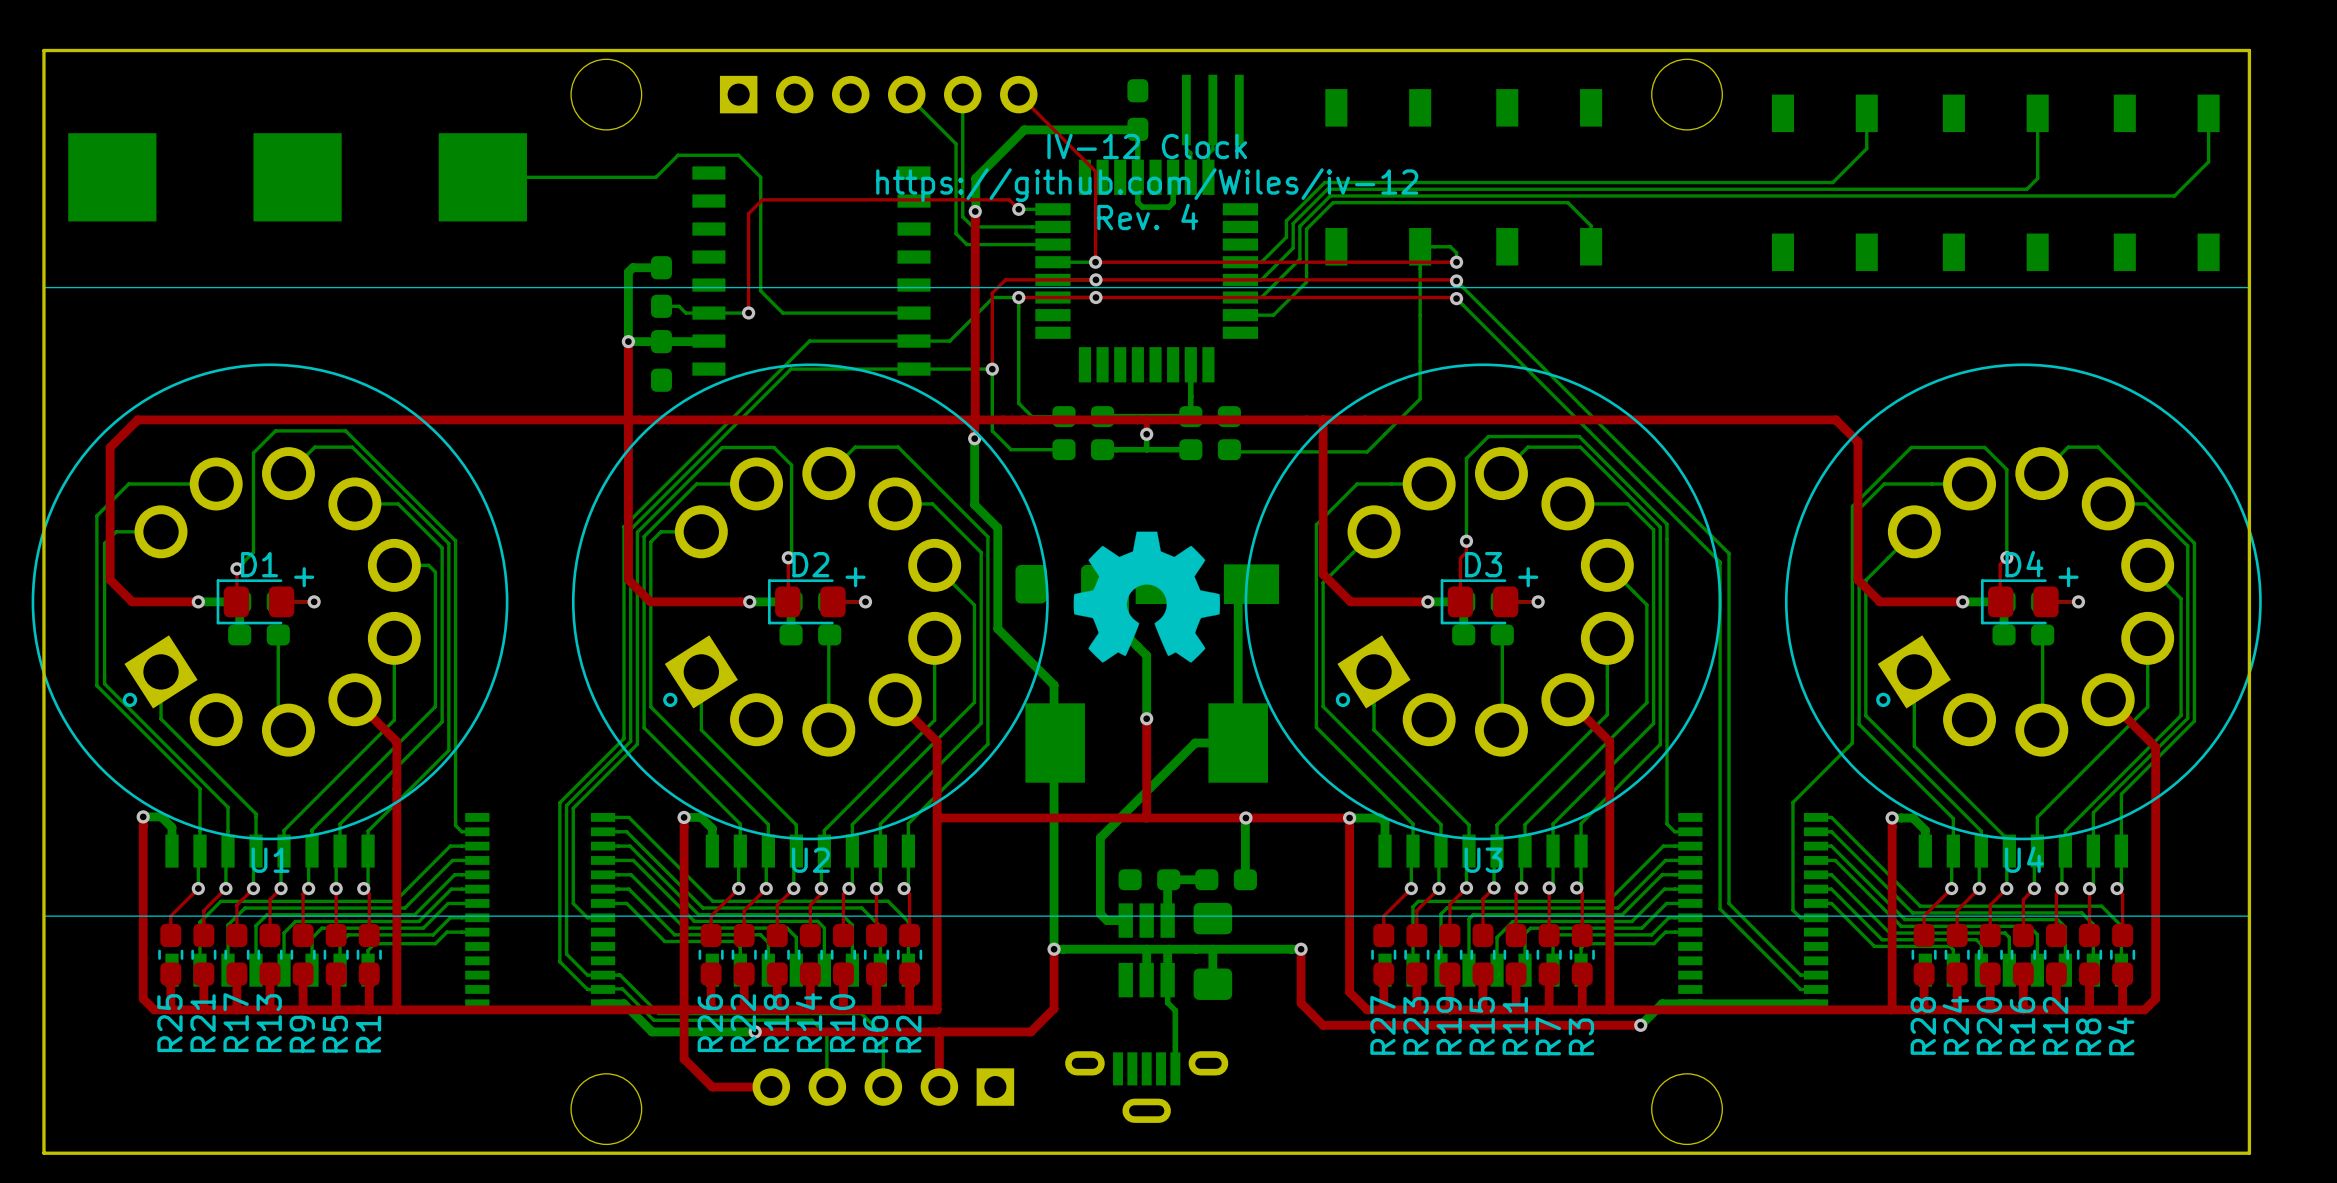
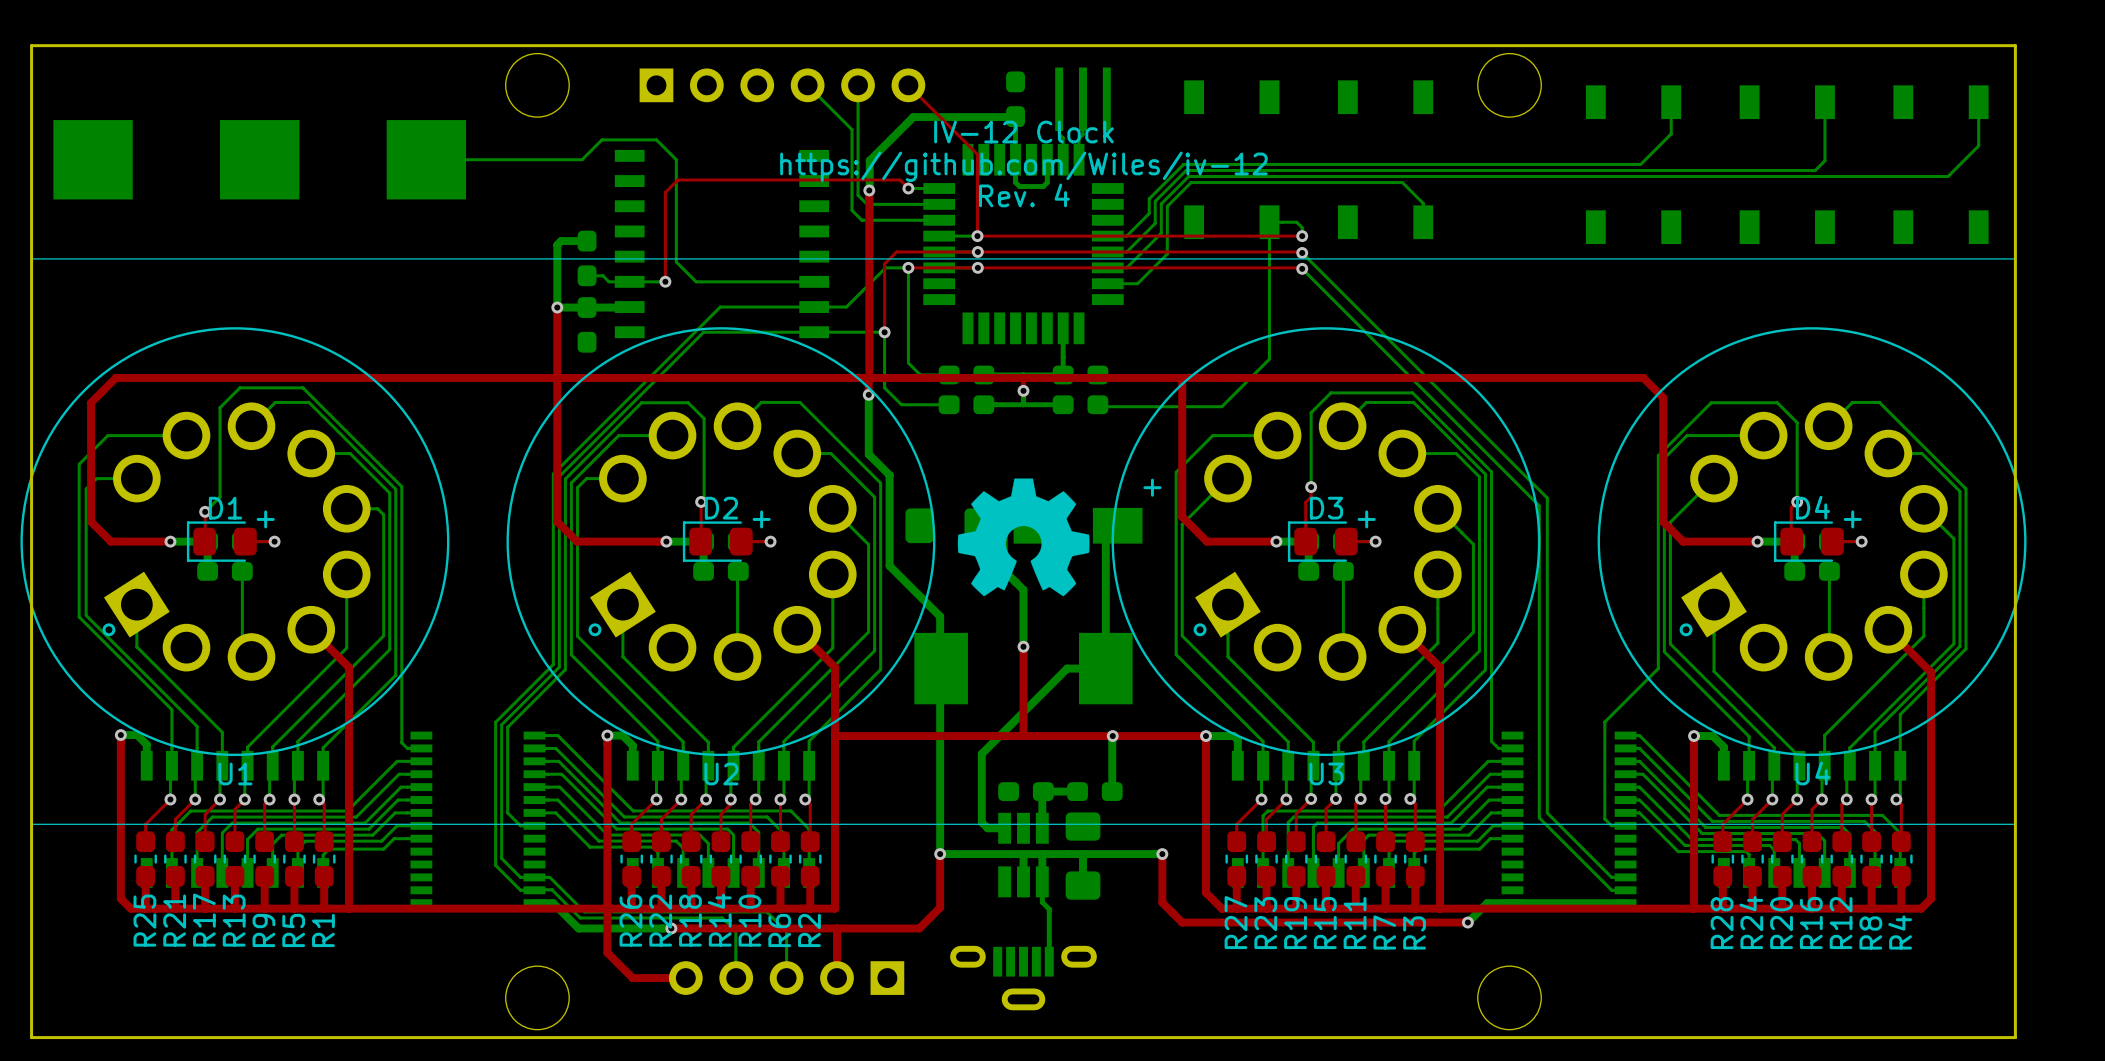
text: none -> + (1152, 487)

